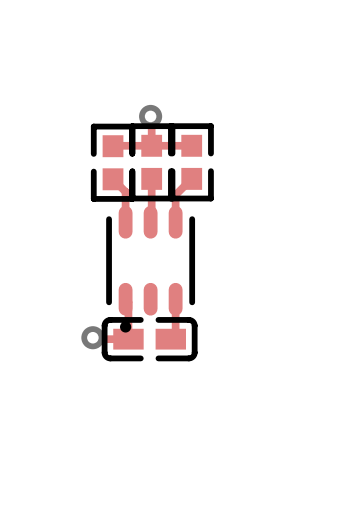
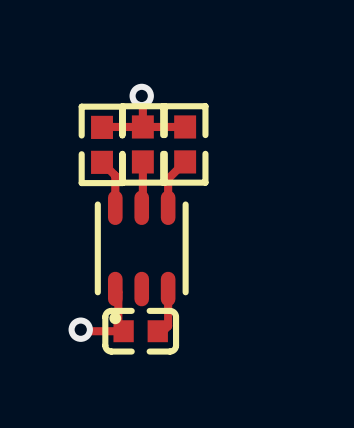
part footprint: [101, 317, 198, 362] -> [102, 307, 180, 355]

